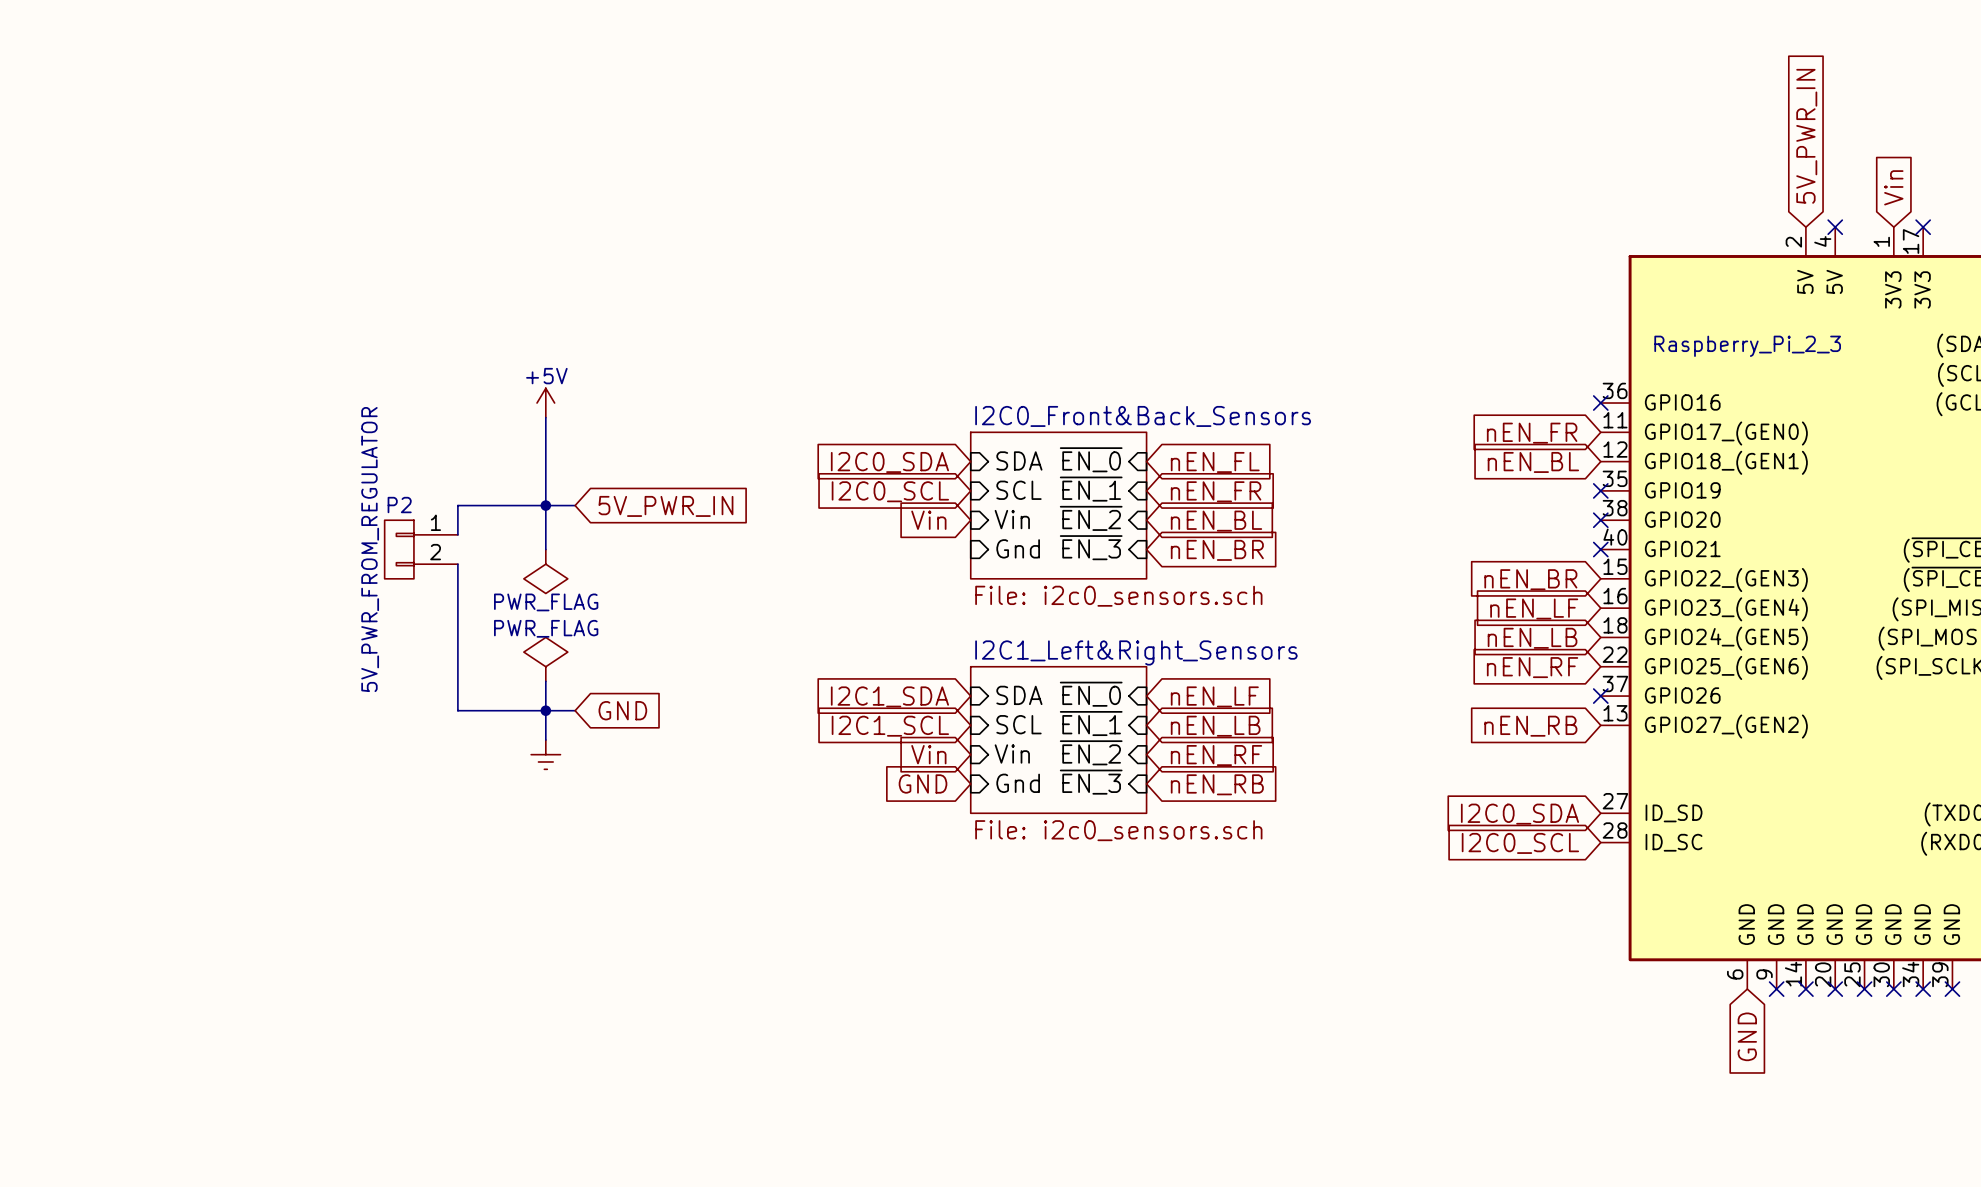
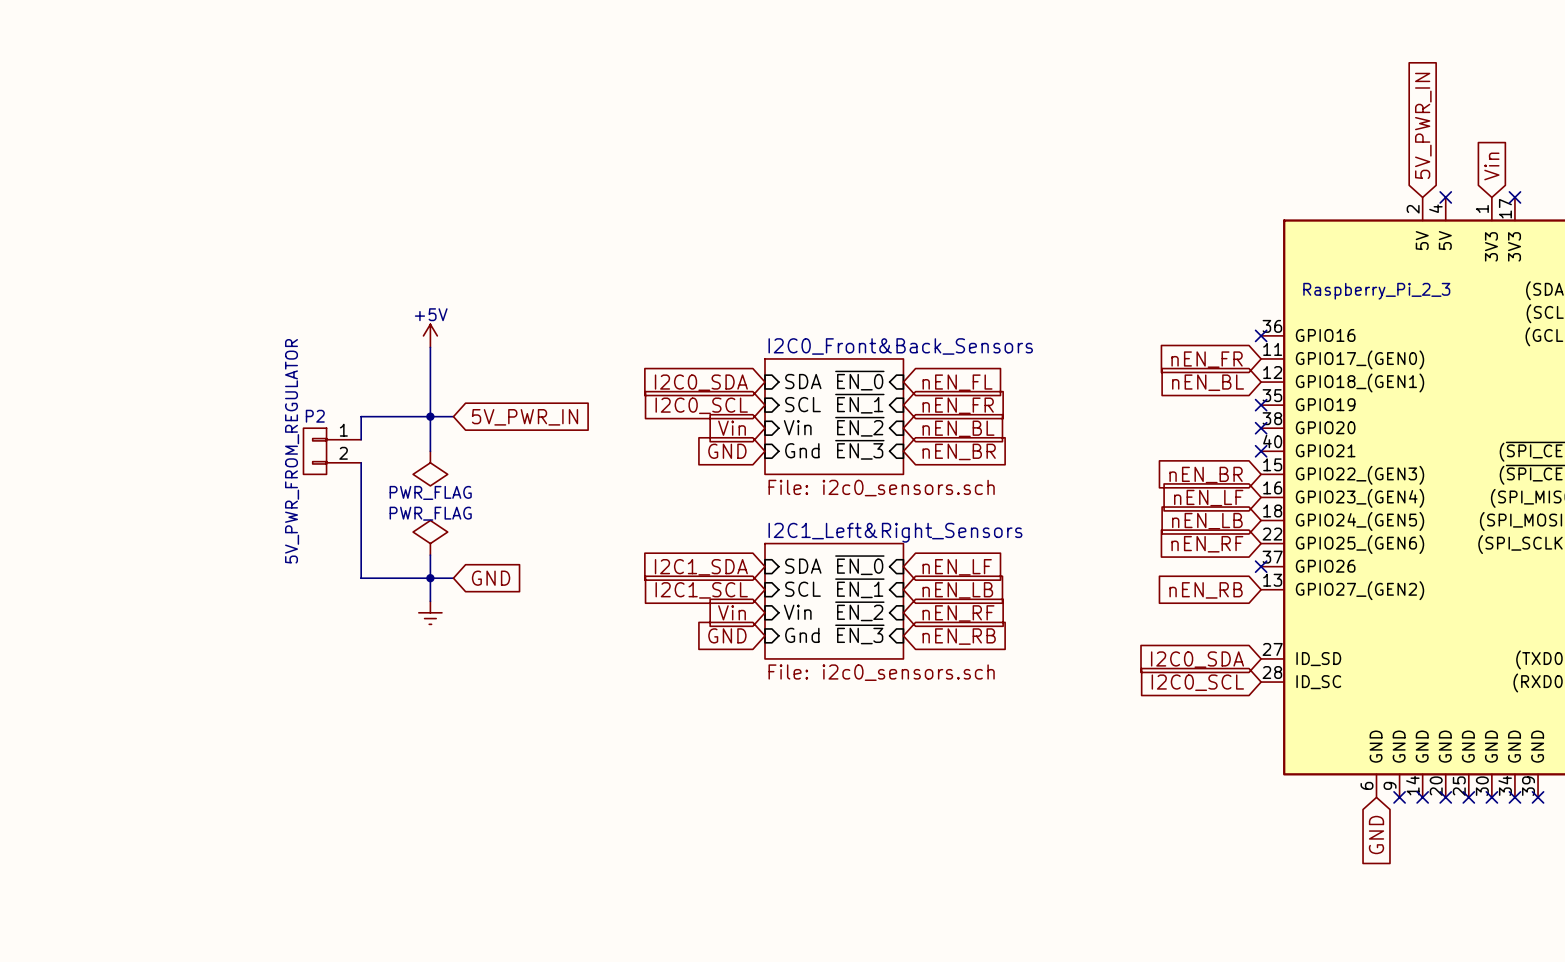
global label: none -> GND (727, 451)

